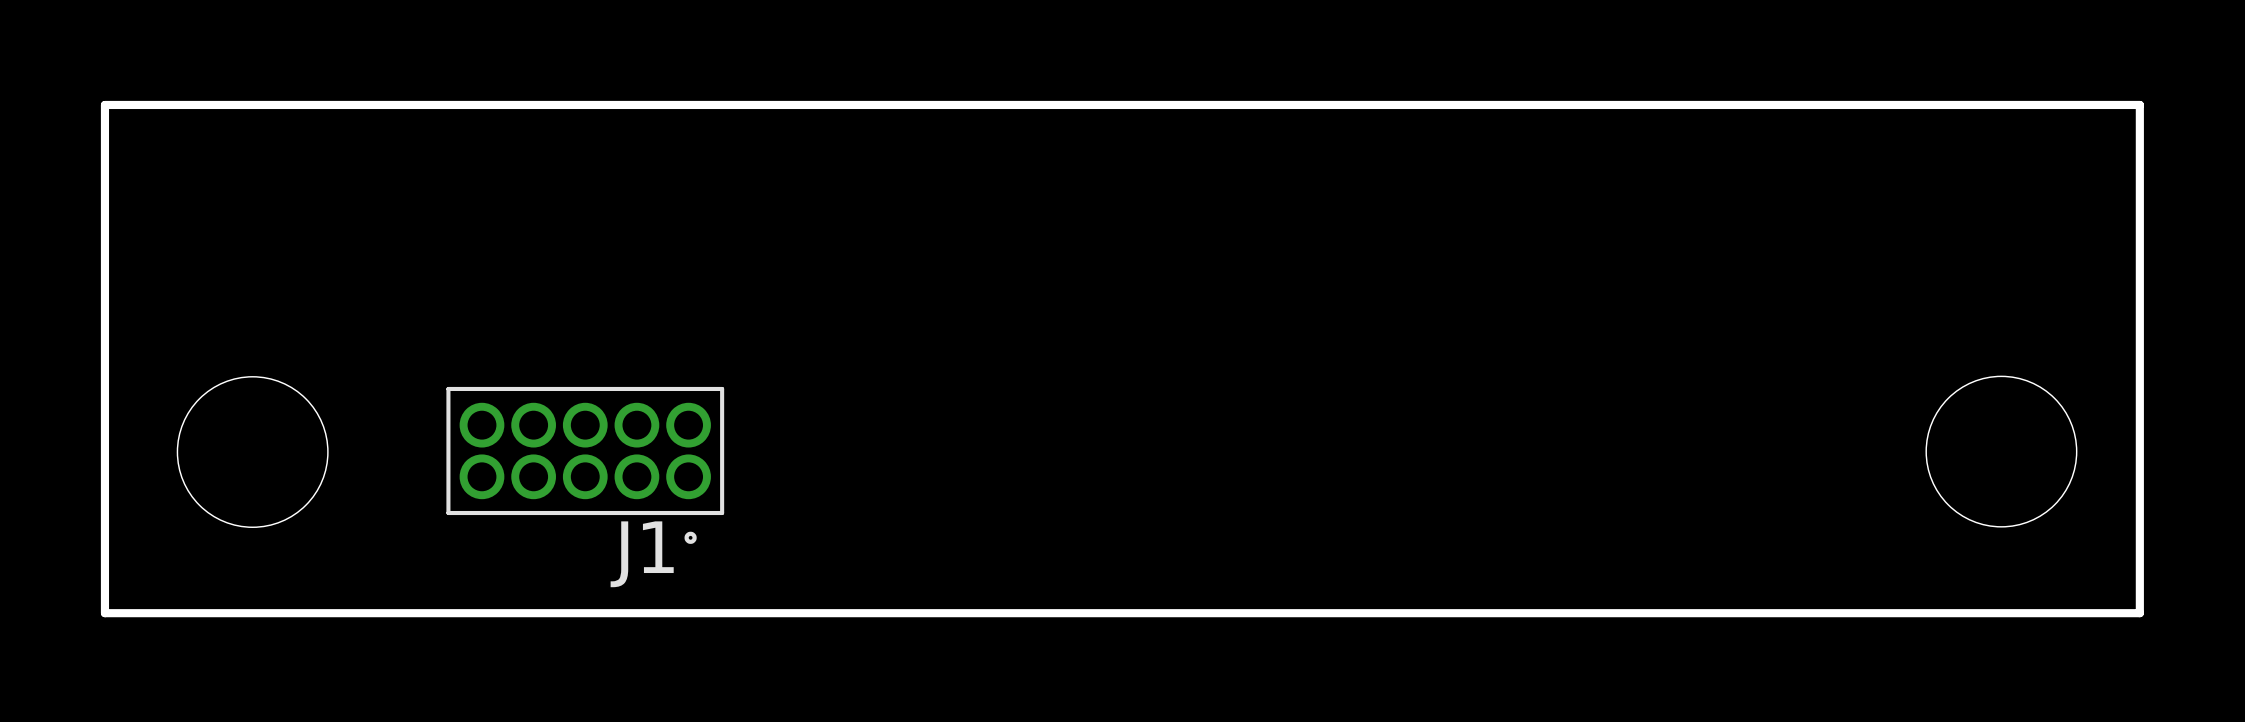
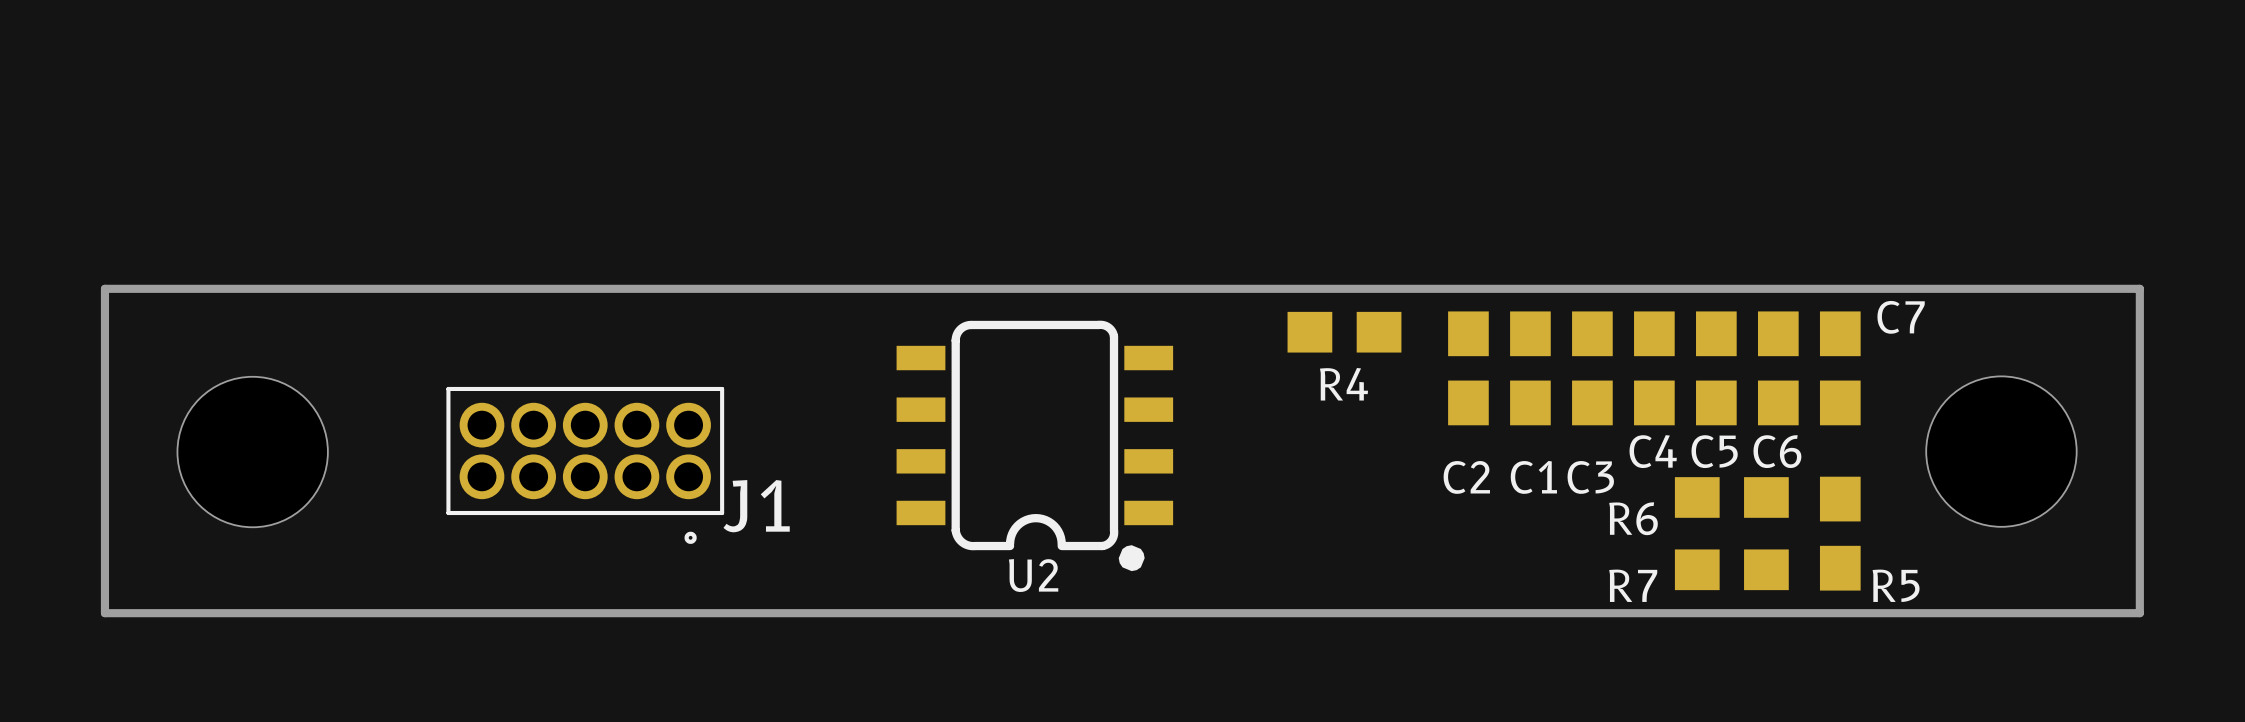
board edge: (2139, 288) (2139, 104) (104, 104) (104, 288) -> (2139, 288) (104, 288)
R4: none -> (1344, 332)
C2: none -> (1468, 368)
C1: none -> (1530, 368)
C3: none -> (1592, 368)
C4: none -> (1654, 368)
C5: none -> (1716, 368)
C6: none -> (1778, 368)
C7: none -> (1840, 368)
U2: none -> (1034, 445)
R6: none -> (1731, 497)
R5: none -> (1840, 533)
J1 name position: J1 (642, 554) -> J1 (756, 506)
R7: none -> (1731, 569)

